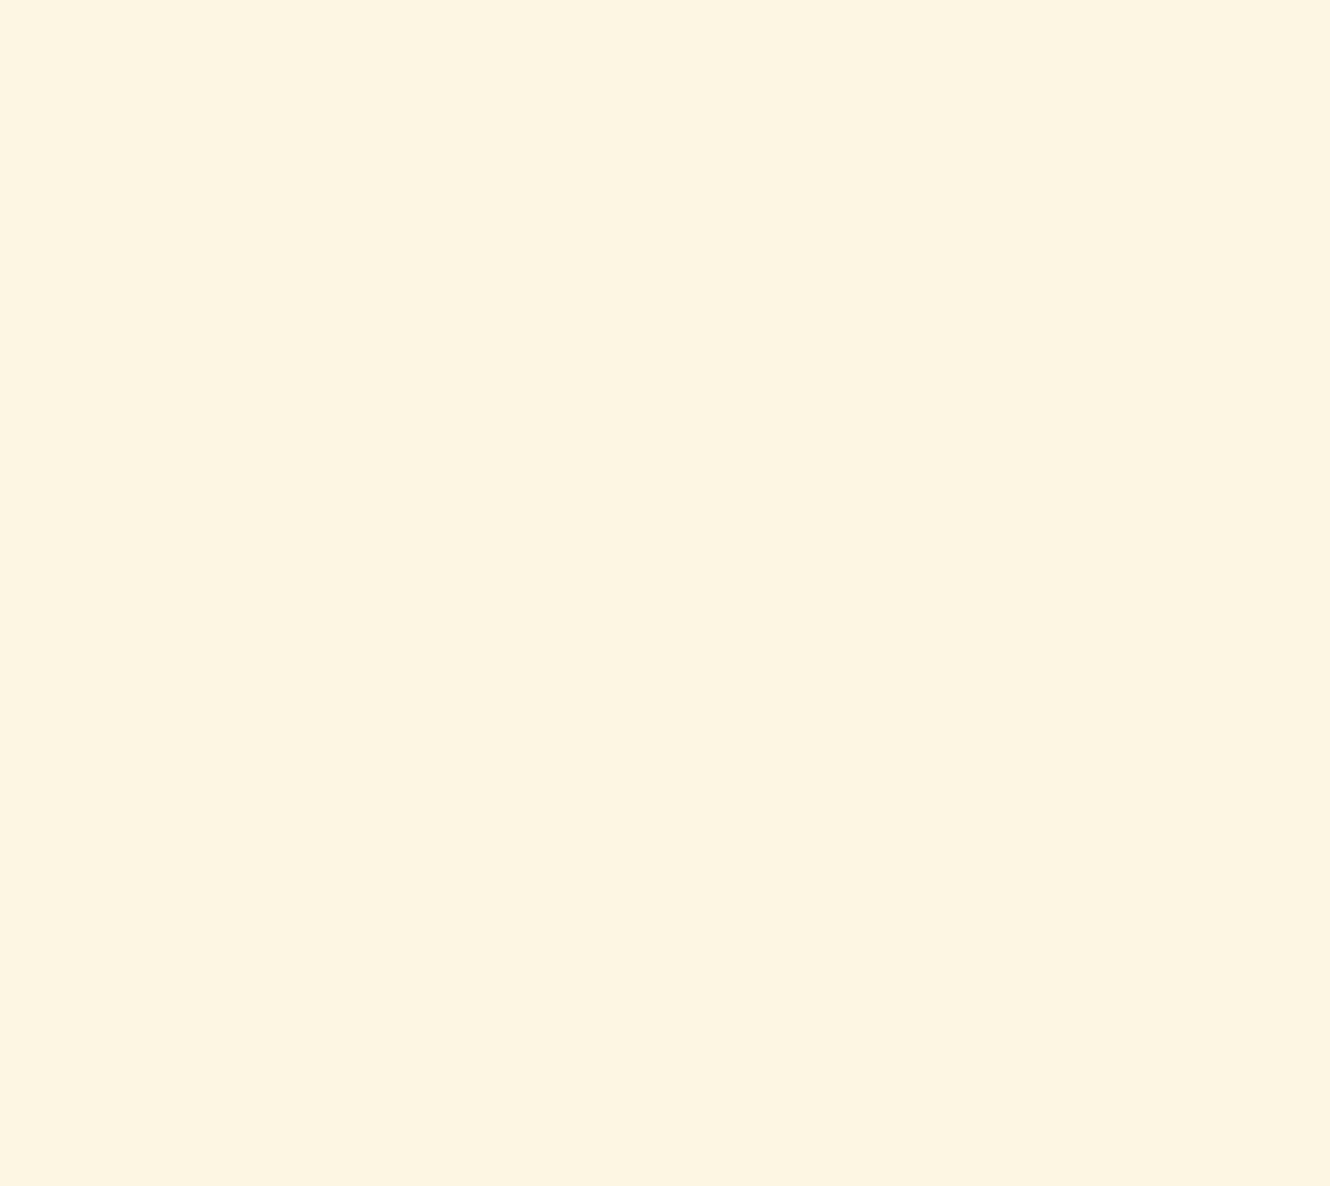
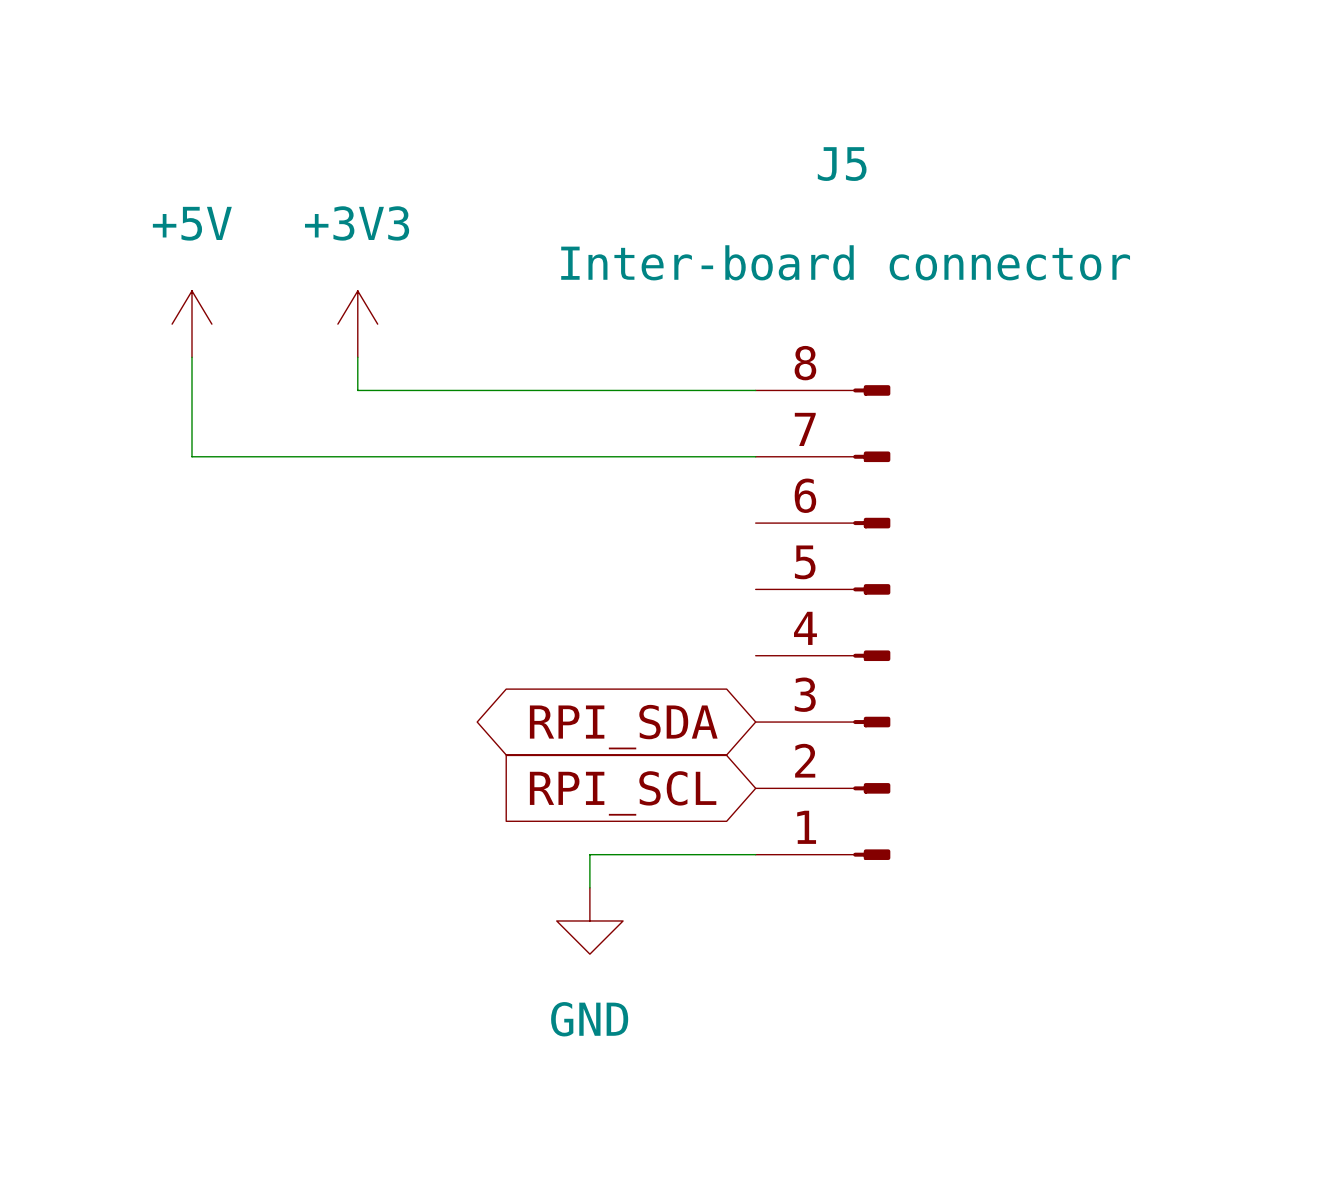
power symbol: none -> +5V (192, 324)
power symbol: none -> +3V3 (357, 324)
wire: none -> (192, 357) (192, 456) (755, 456)
wire: none -> (357, 357) (357, 390) (755, 390)
J5: none -> Inter-board connector (823, 622)
global label: none -> RPI_SDA (623, 727)
global label: none -> RPI_SCL (623, 793)
wire: none -> (755, 854) (589, 854) (589, 887)
power symbol: none -> GND (589, 920)

